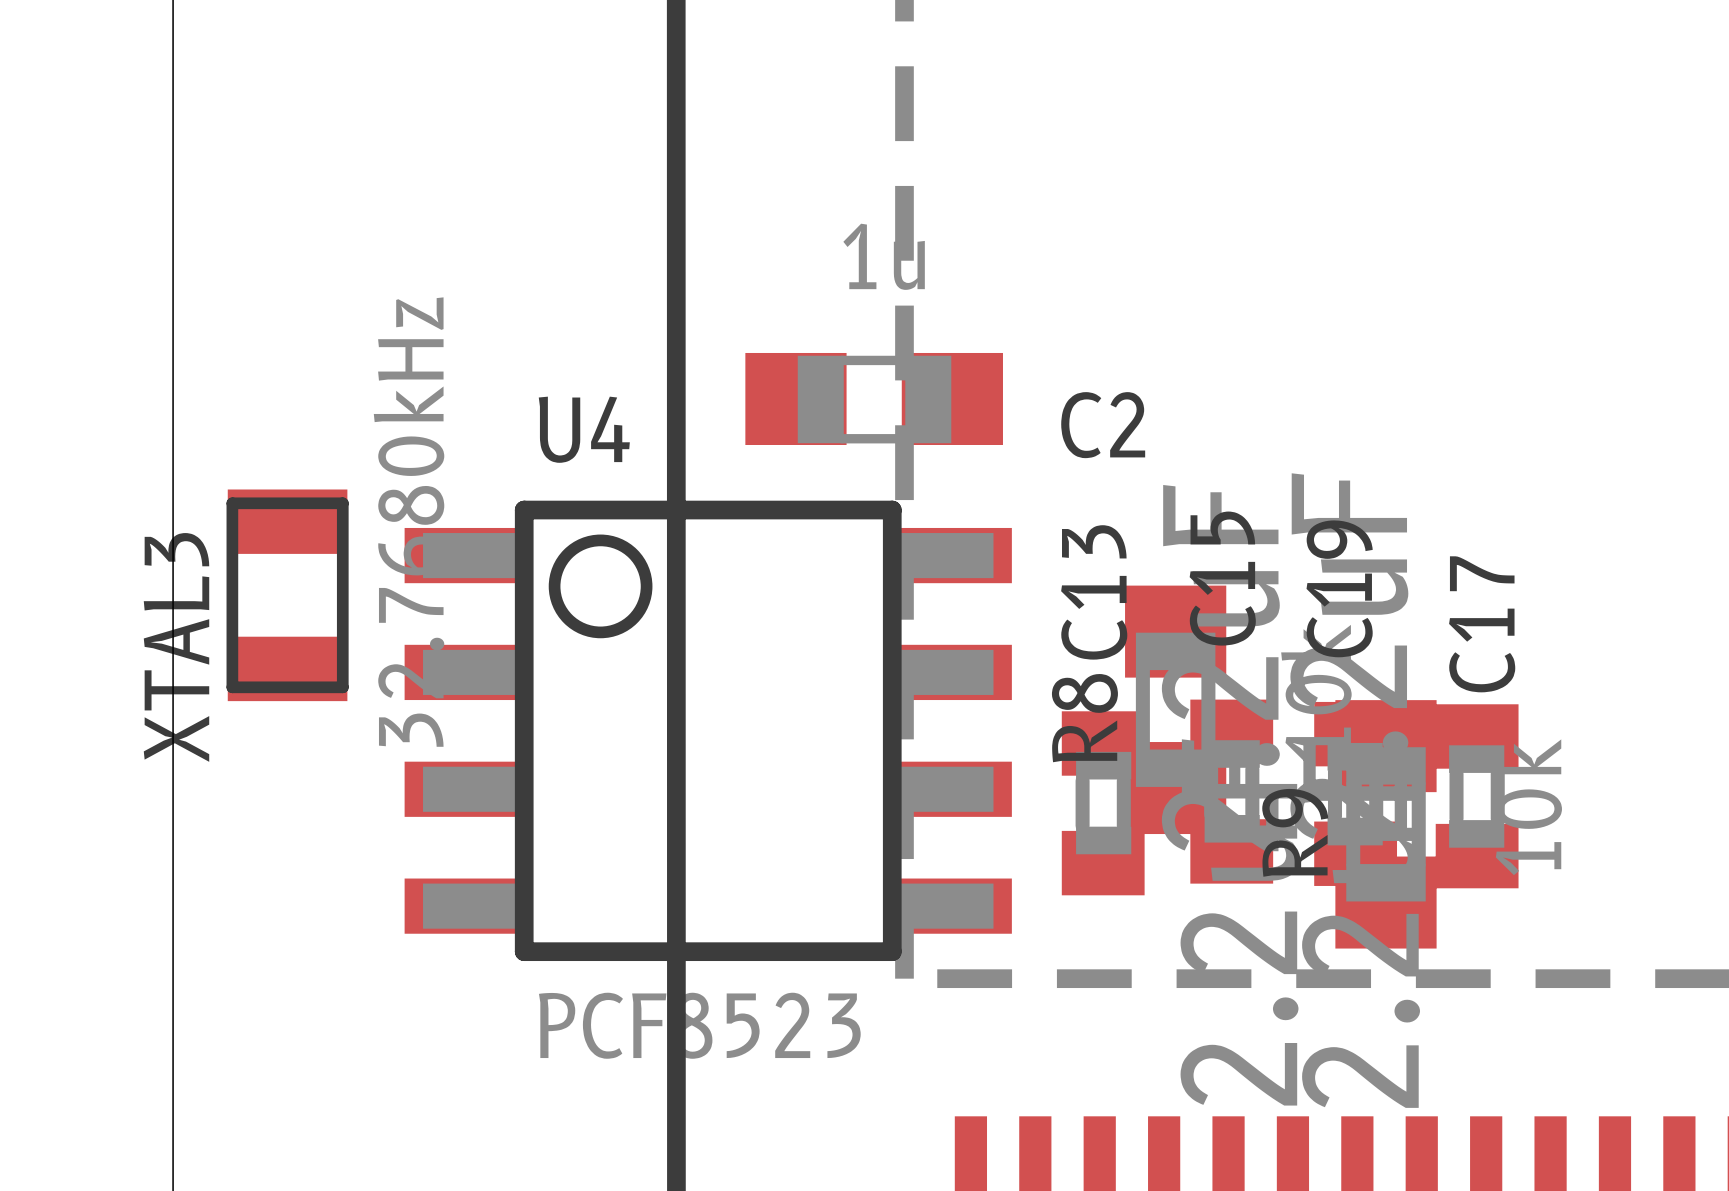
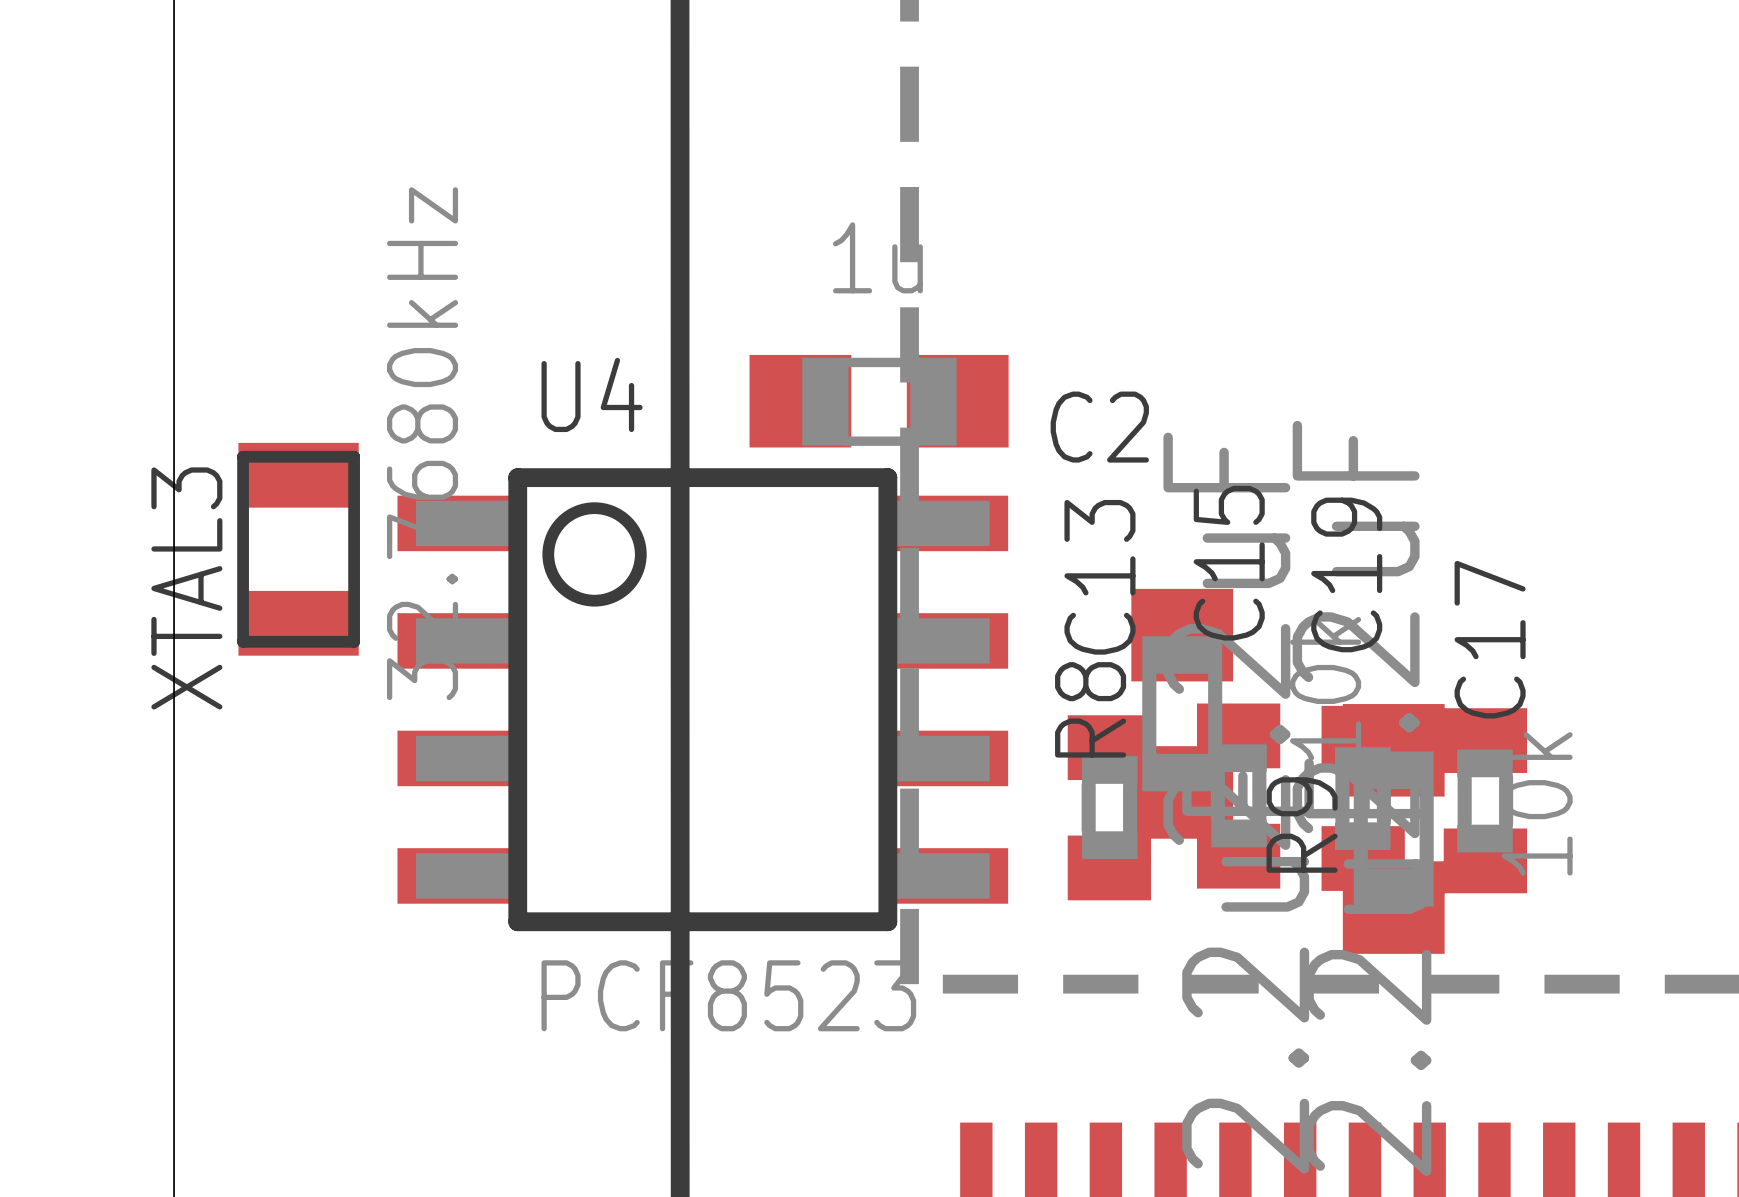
XTAL3 position: (287, 595) -> (298, 549)
U4 position: (708, 730) -> (702, 699)

